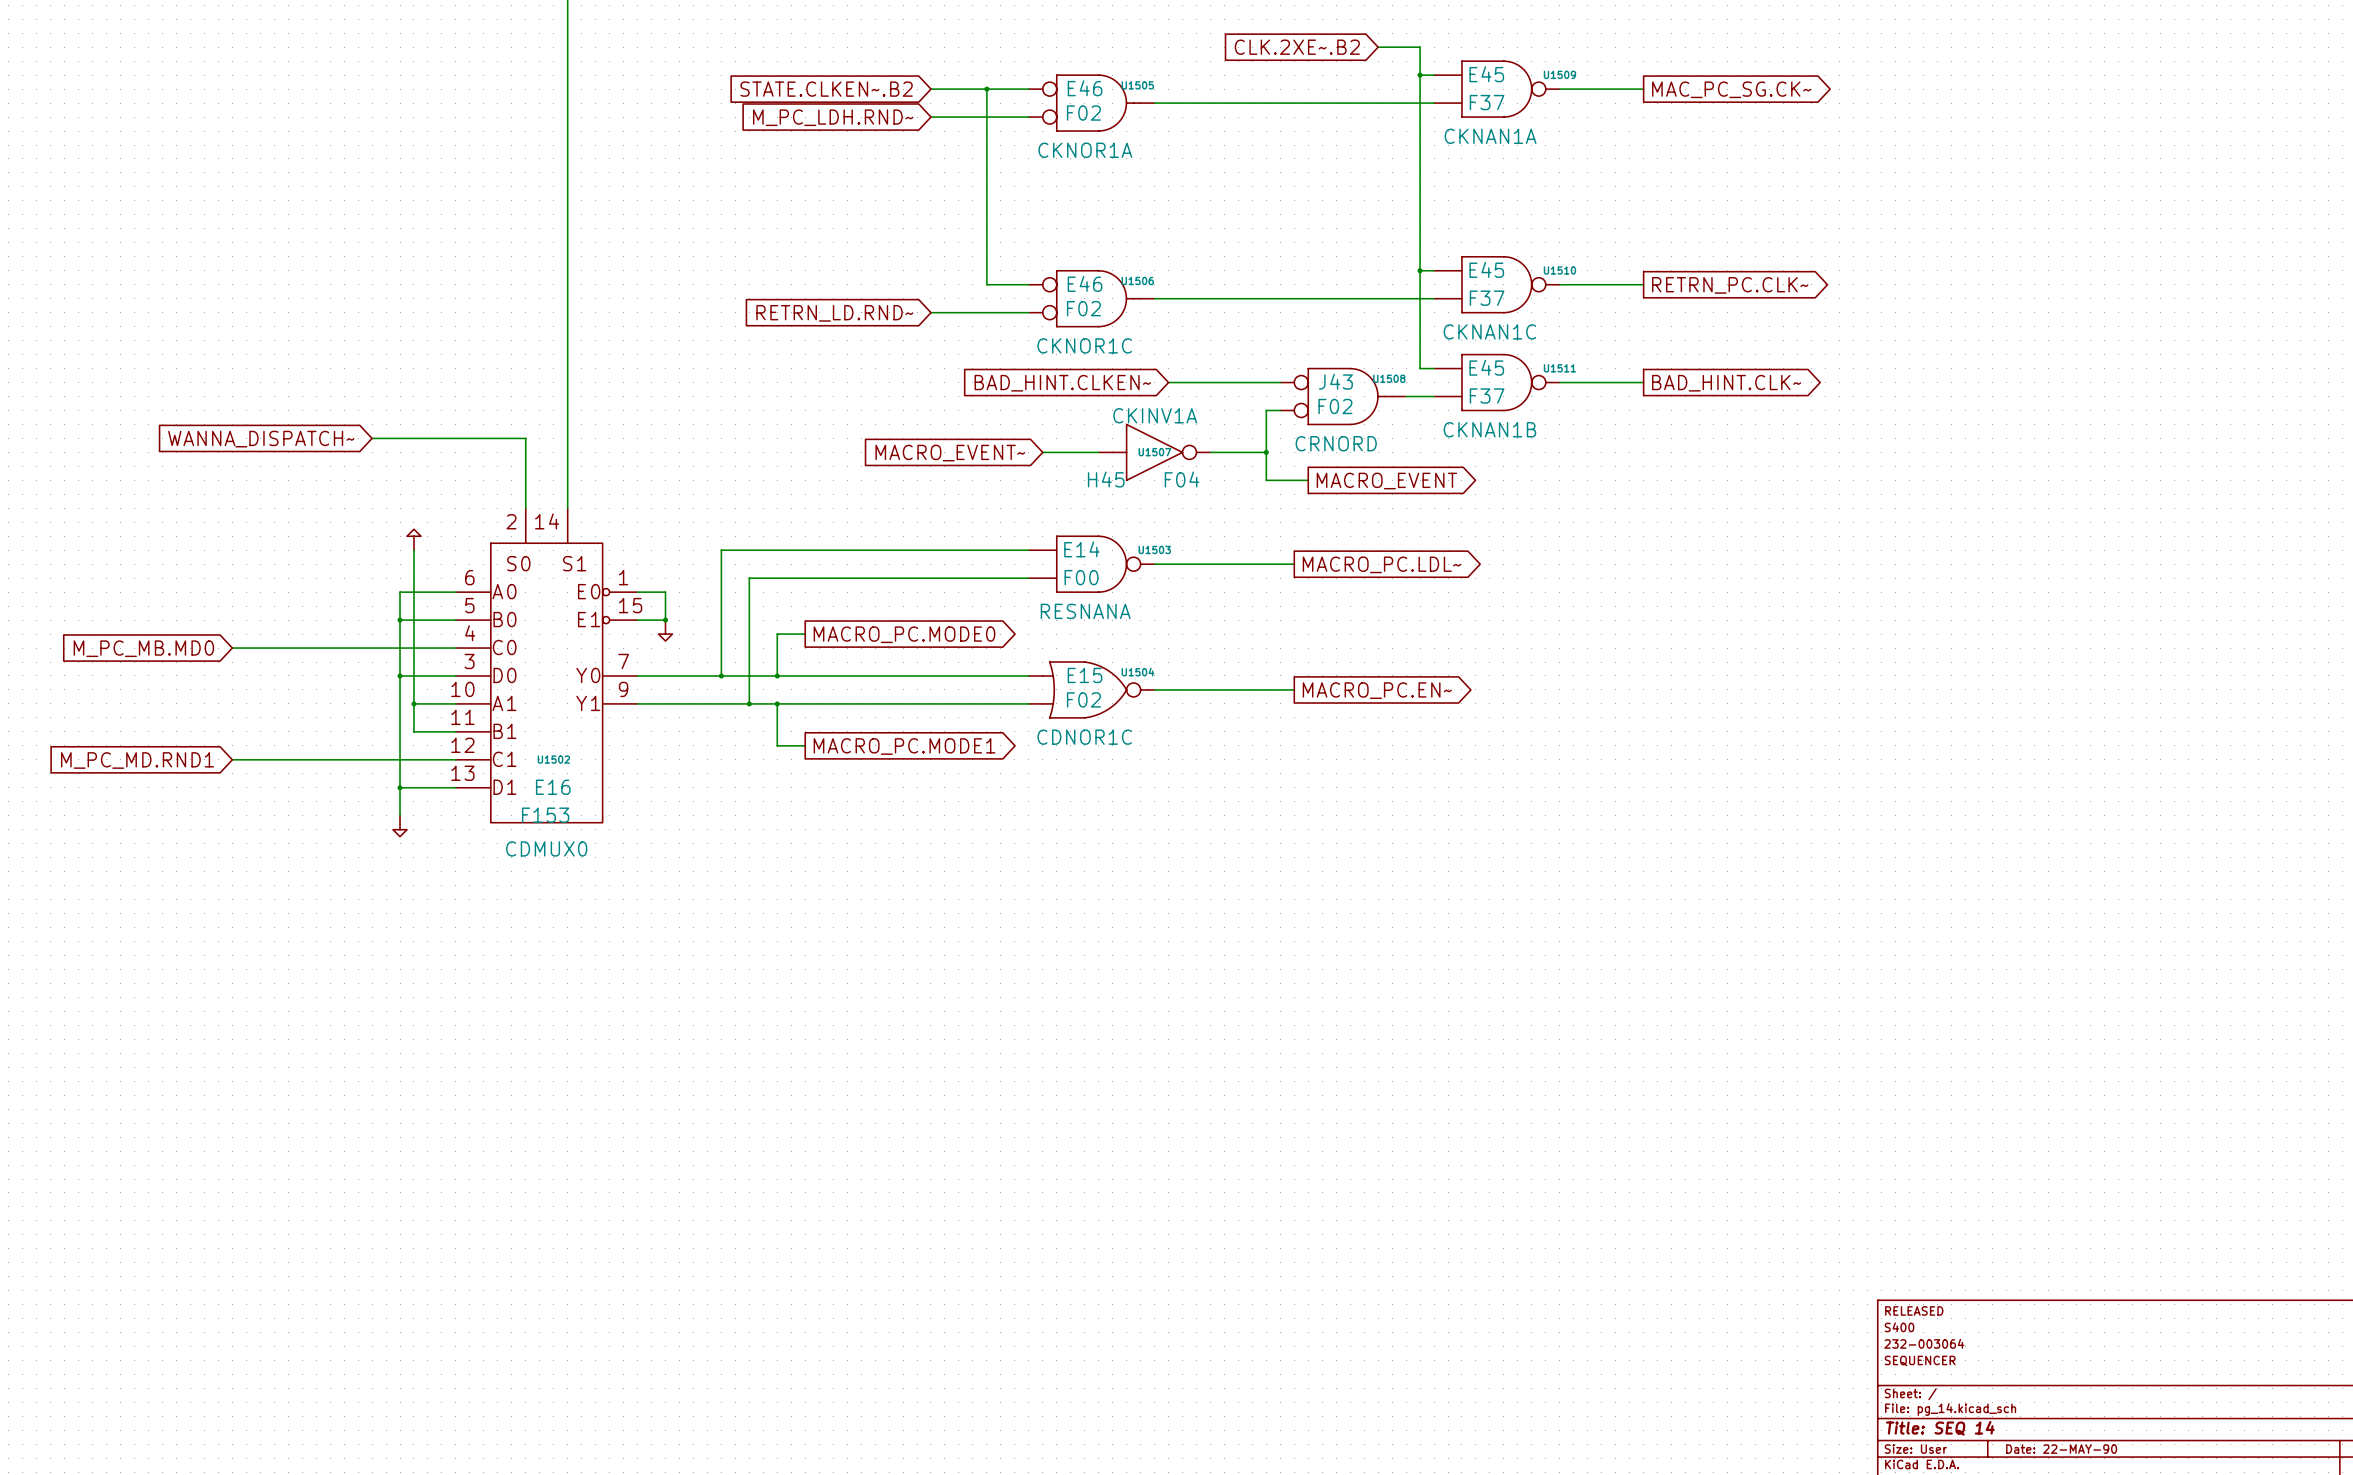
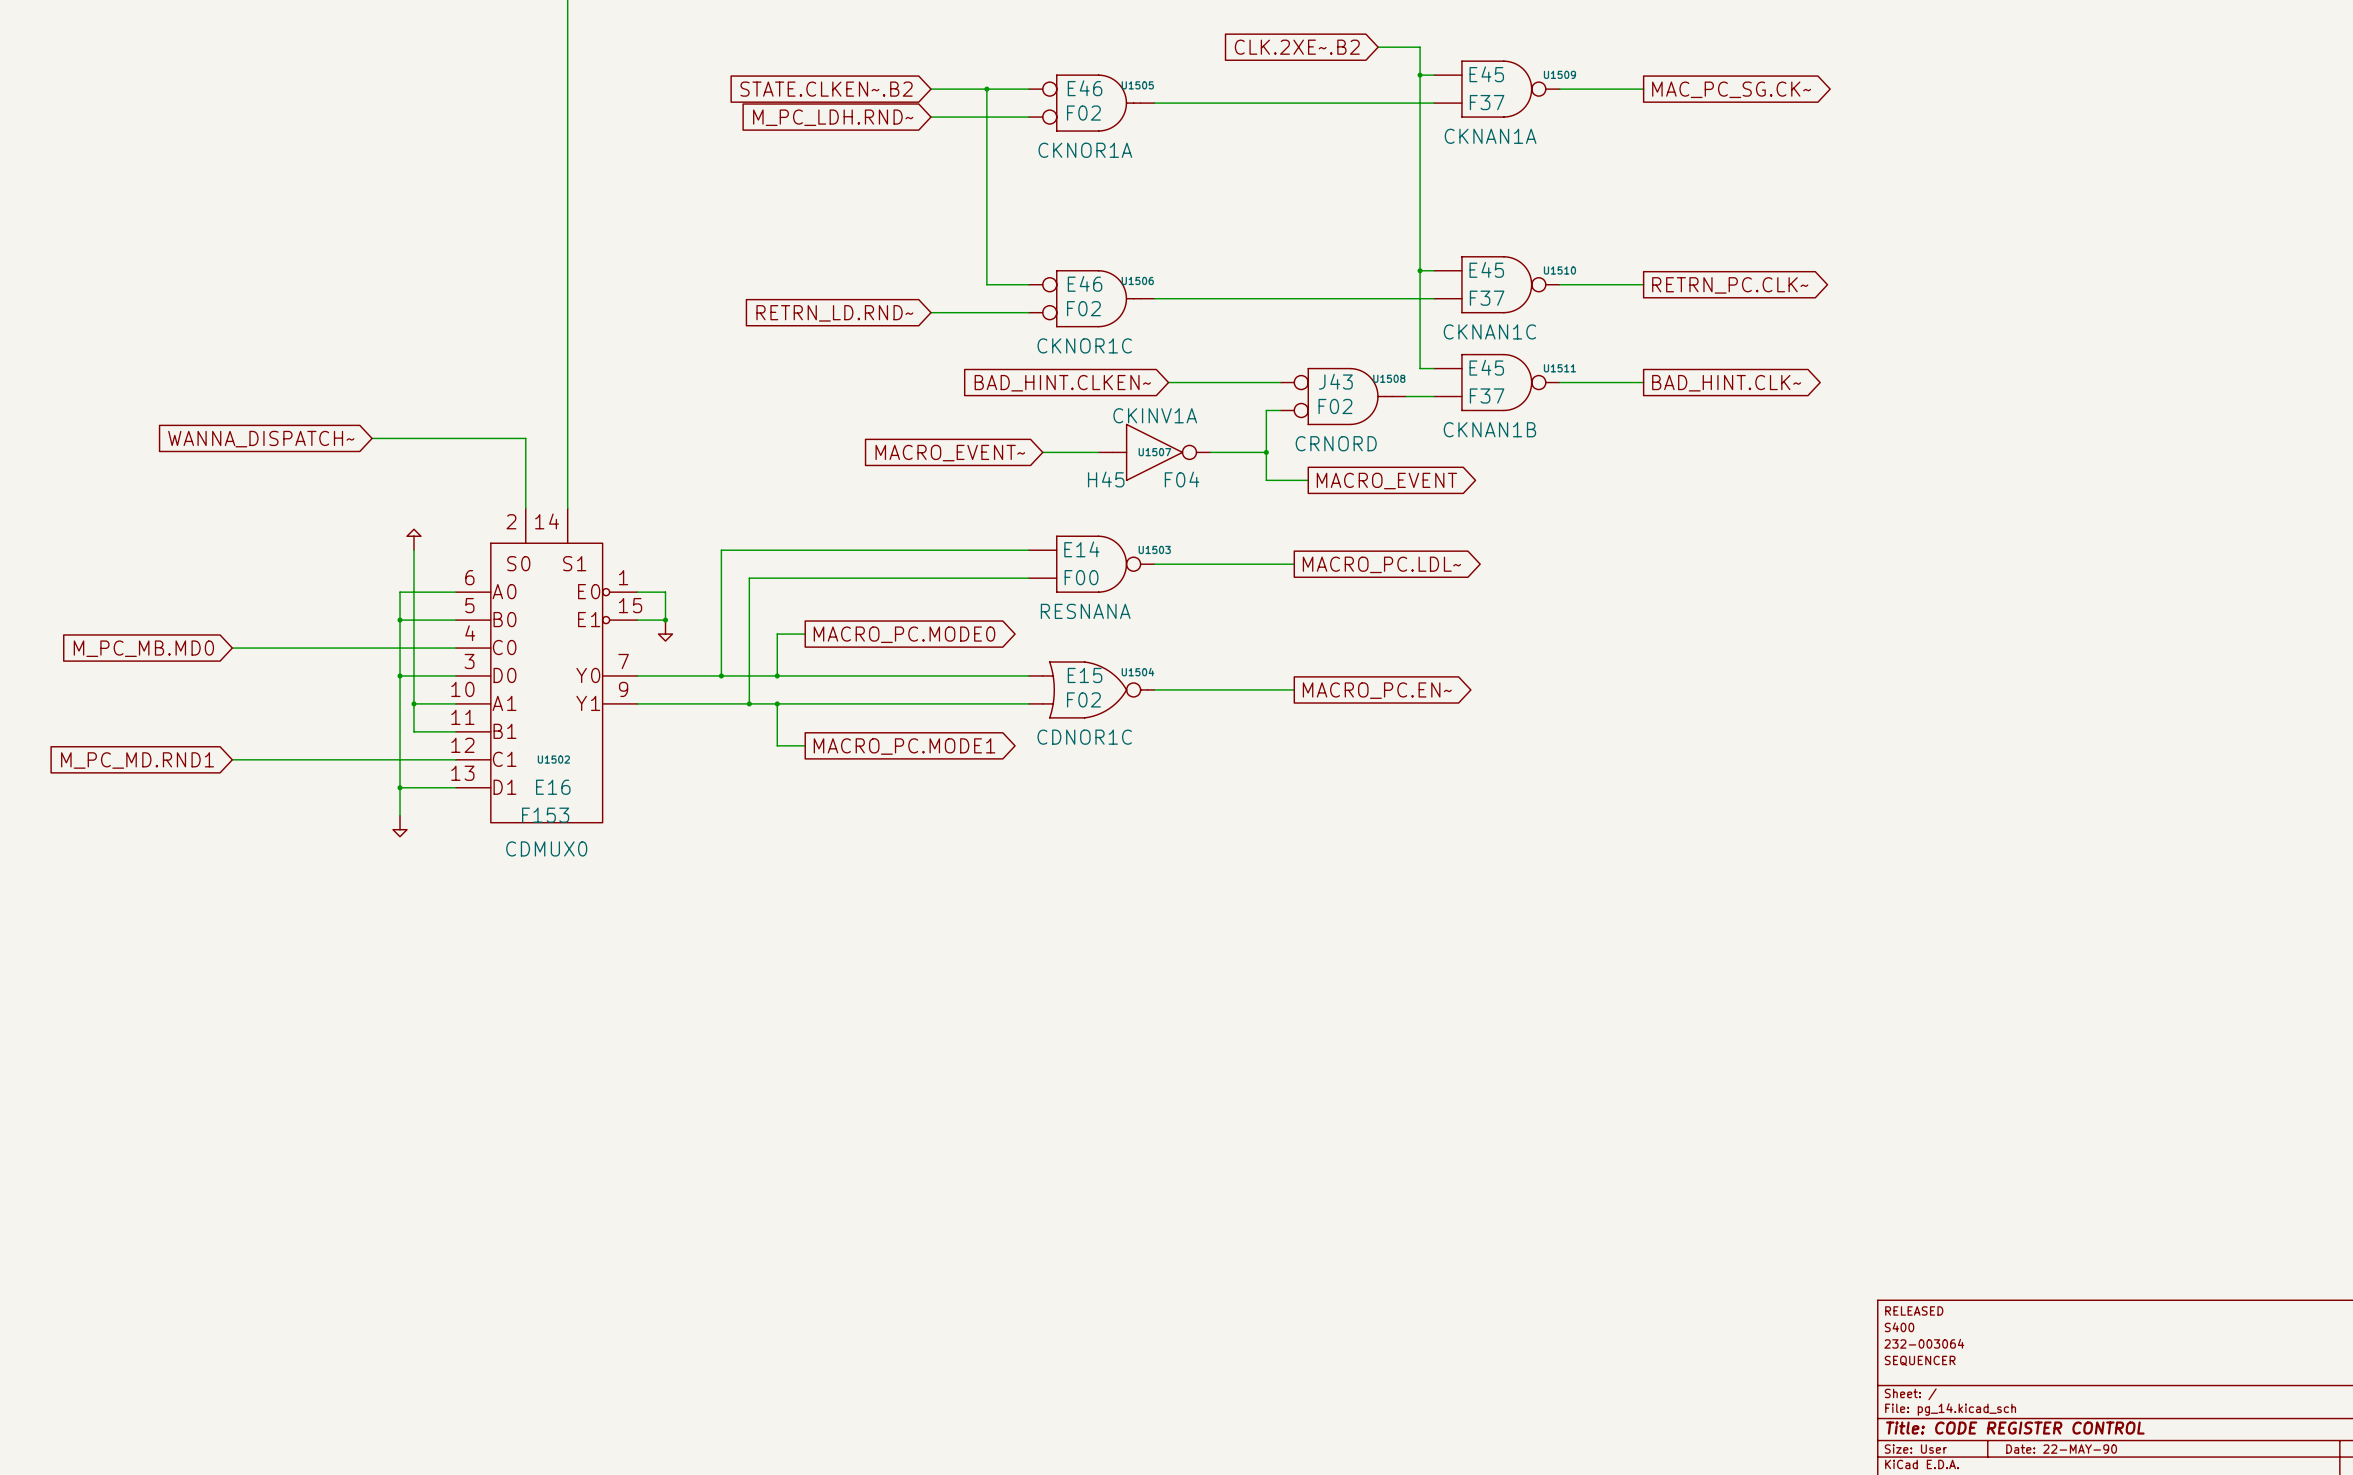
title block: Title: SEQ 14 (1940, 1428) -> Title: CODE REGISTER CONTROL (2015, 1428)

